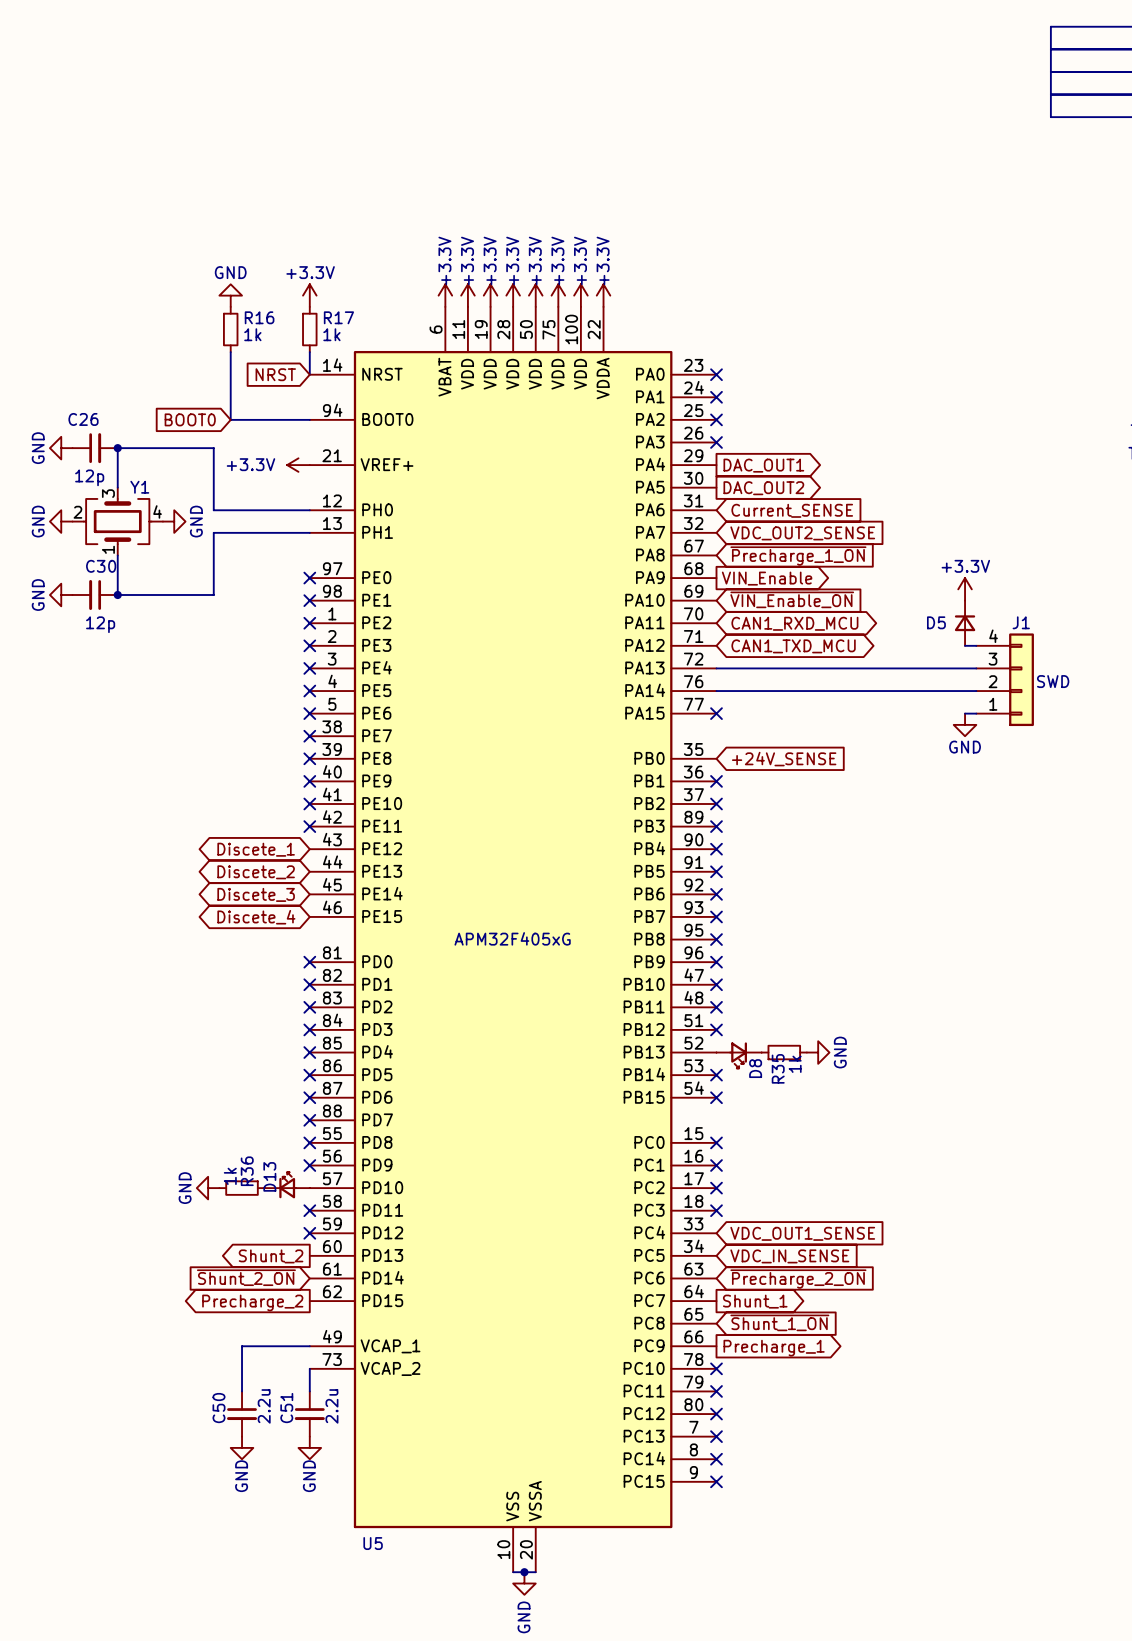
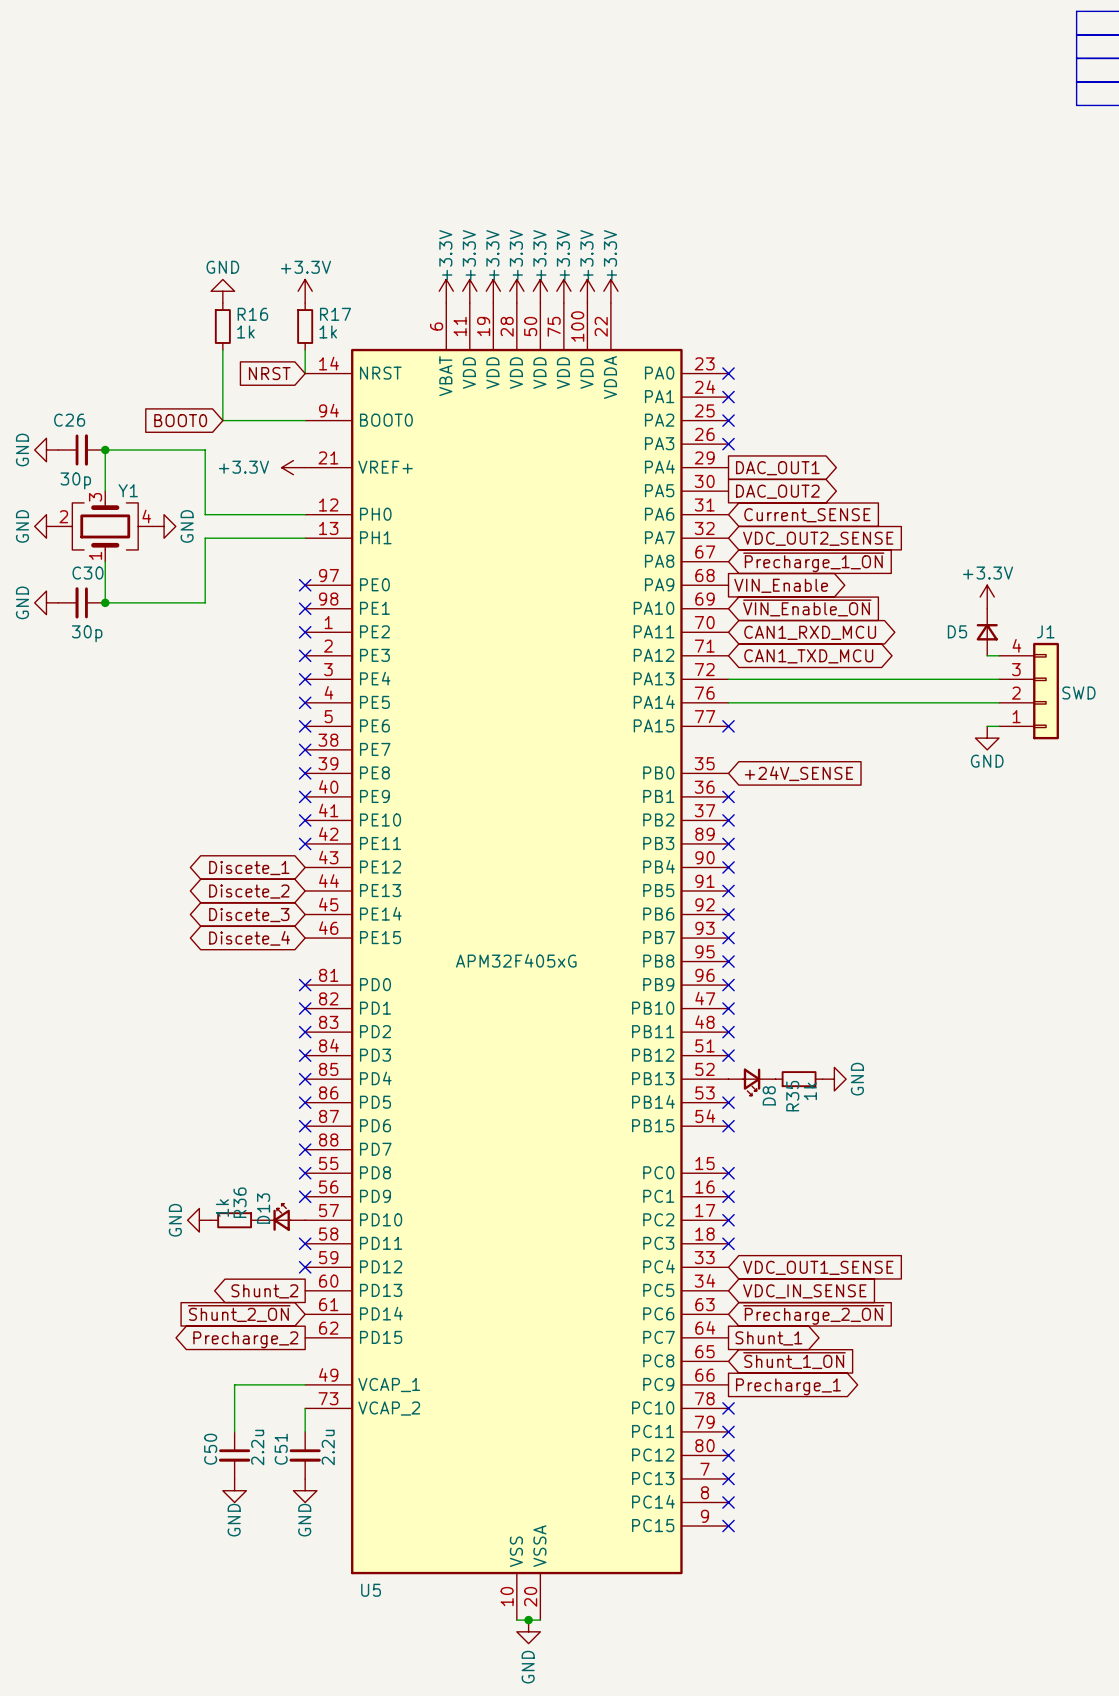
C26 value: 12p (89, 477) -> 30p (75, 480)
C30 value: 12p (100, 624) -> 30p (87, 633)

